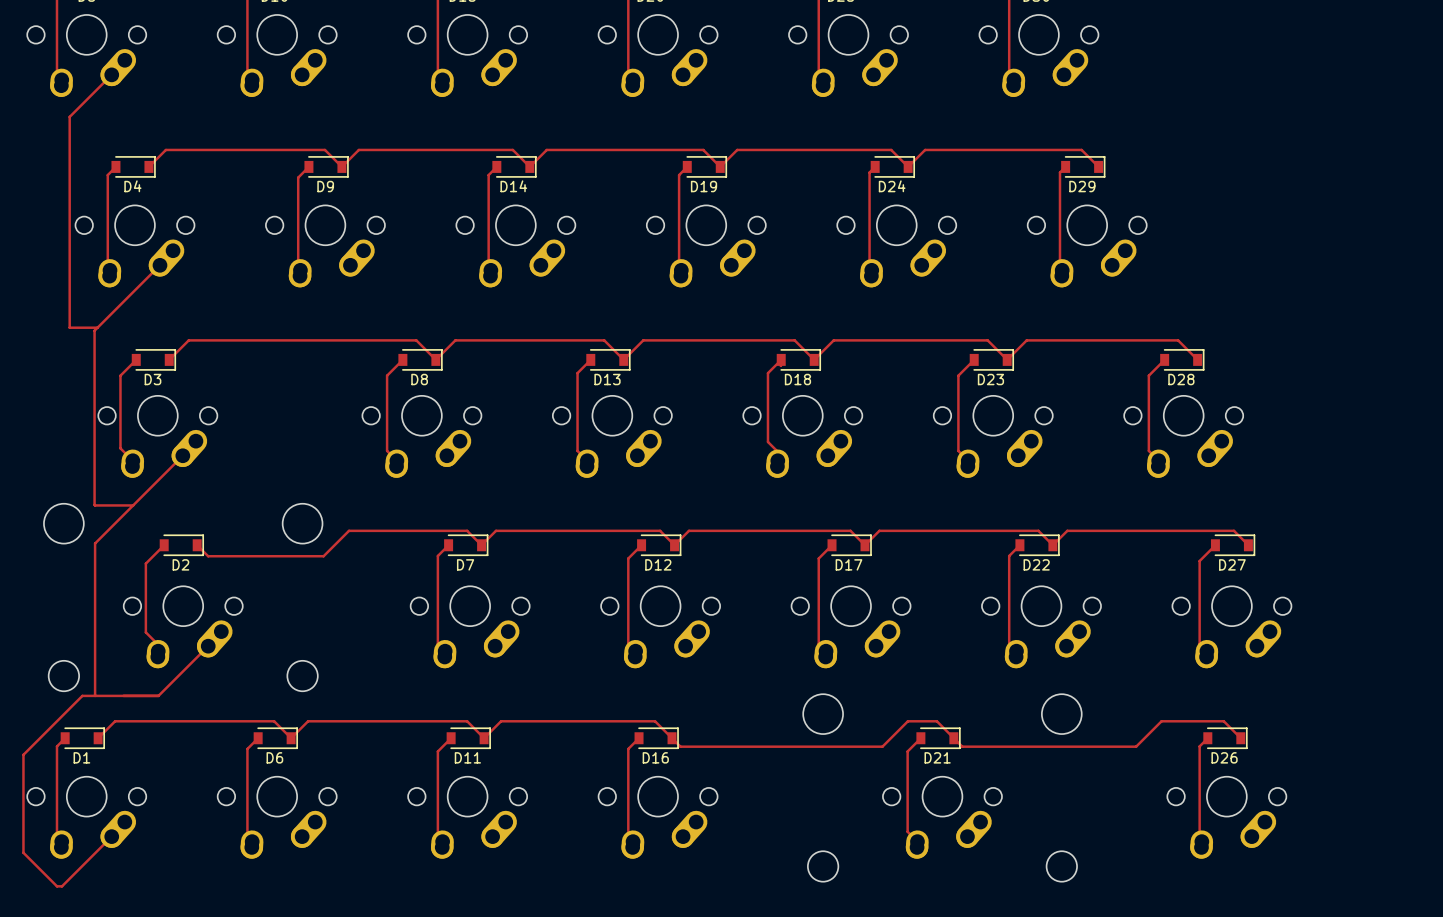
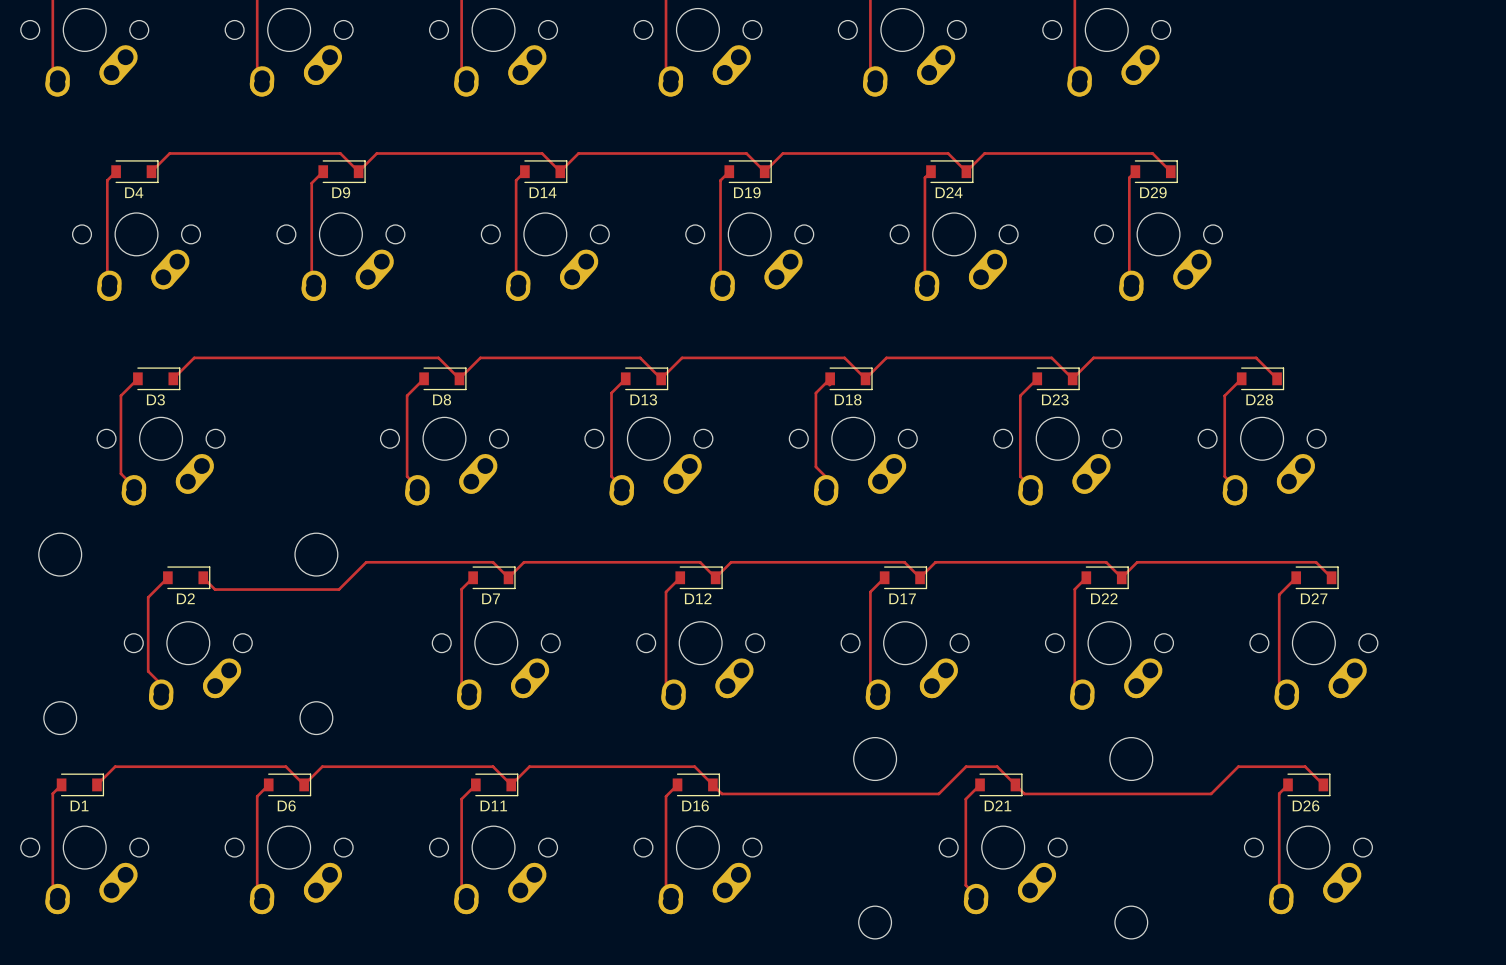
track: (111, 74) (69, 116) (69, 327) (97, 327) -> none
track: (159, 265) (94, 330) (94, 504) (133, 505) -> none
track: (182, 455) (95, 543) (95, 695) -> none
track: (208, 646) (158, 695) (82, 695) (23, 754) (23, 852) (56, 886) (62, 886) (111, 836) -> none

